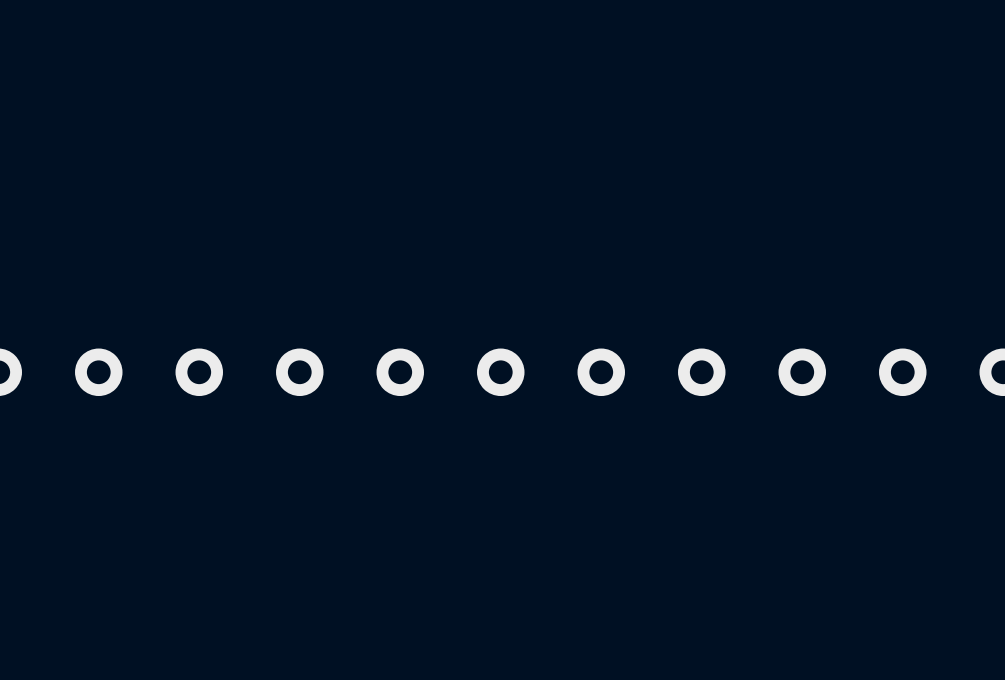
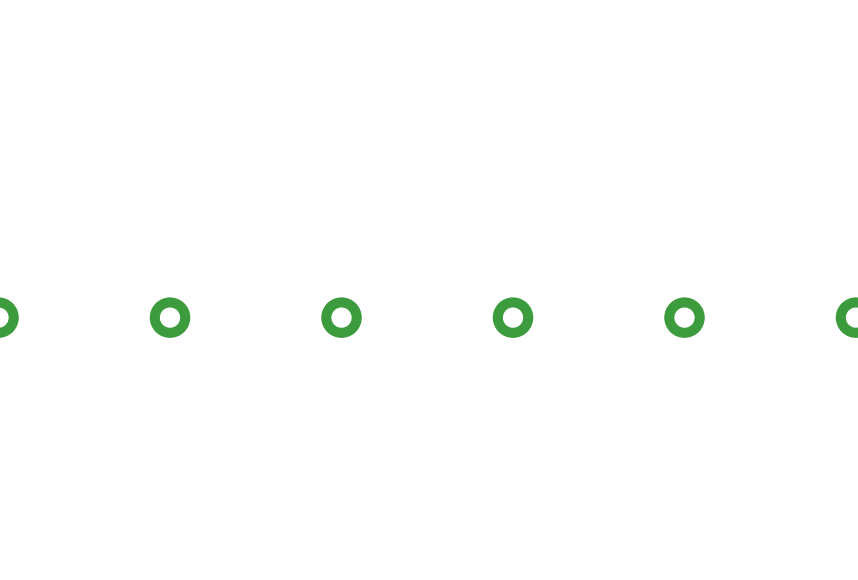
via: (98, 372) -> none
via: (299, 372) -> none
via: (500, 372) -> none
via: (701, 372) -> none
via: (902, 372) -> none

